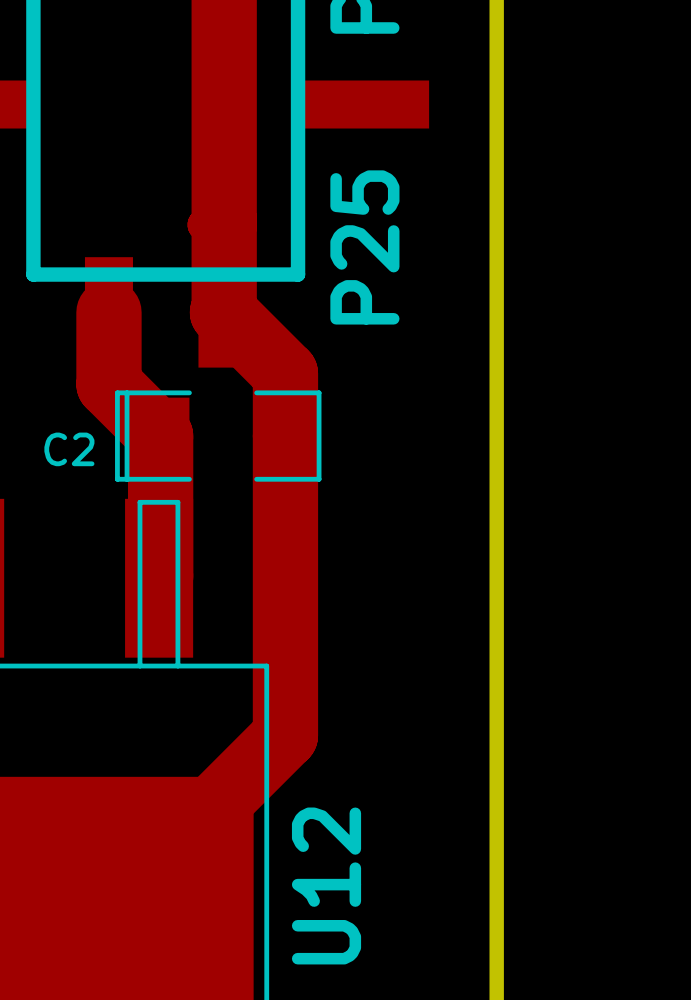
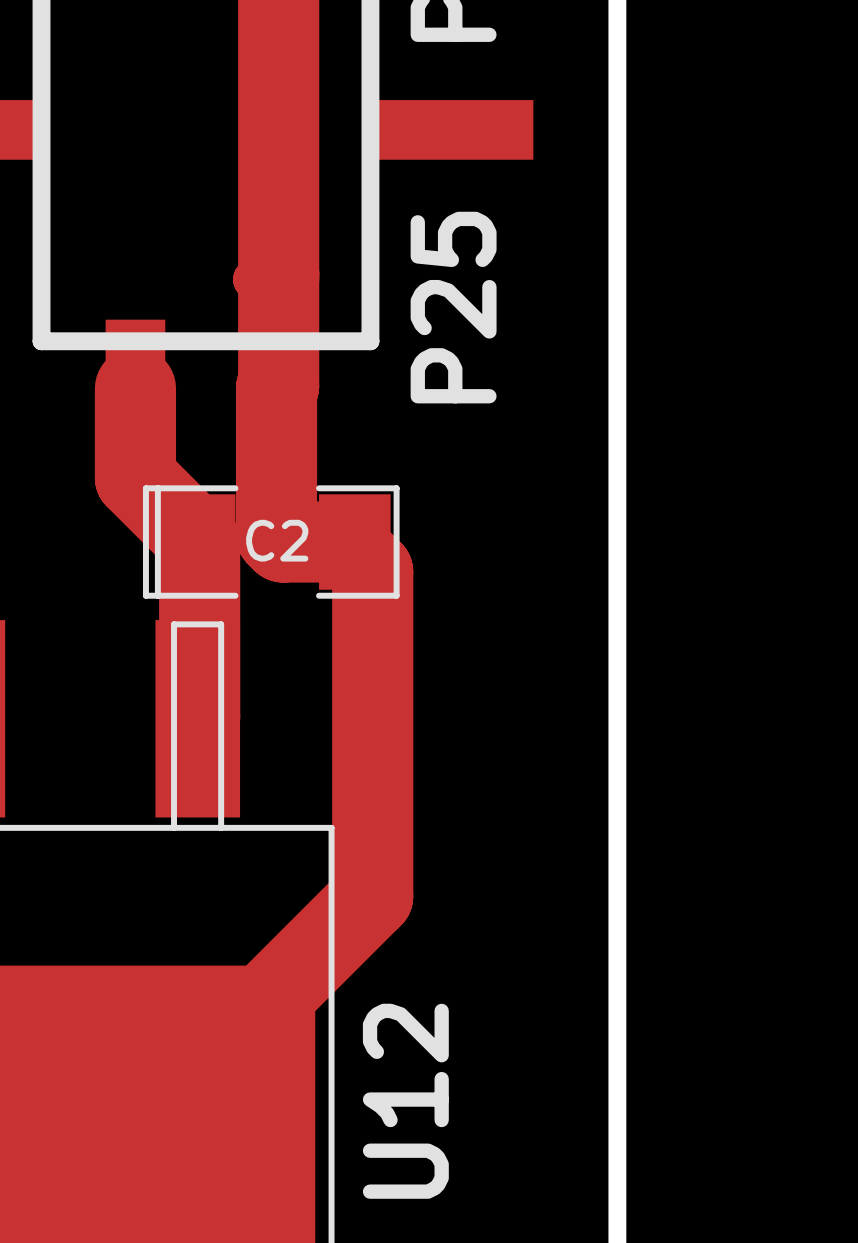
top track: (222, 312) (285, 373) (285, 735) -> (276, 388) (276, 535) (283, 542) (342, 542) (372, 571) (372, 896) (354, 914)
C2 name position: C2 (69, 449) -> C2 (277, 540)

